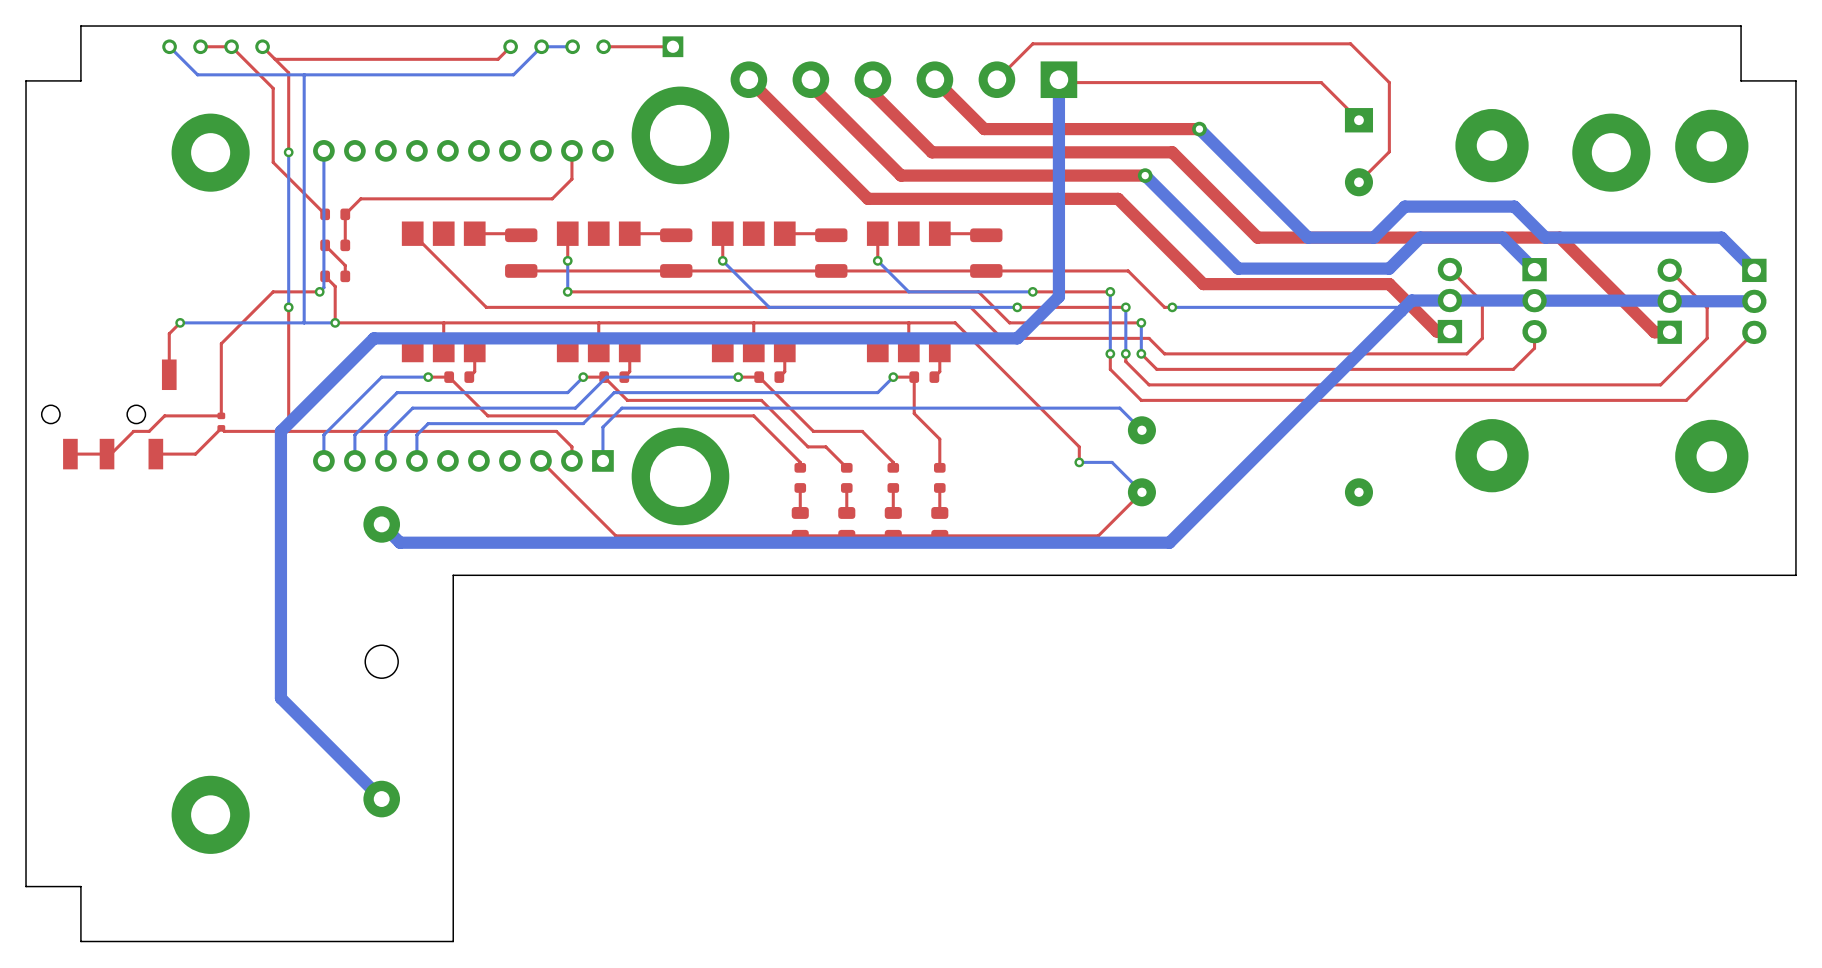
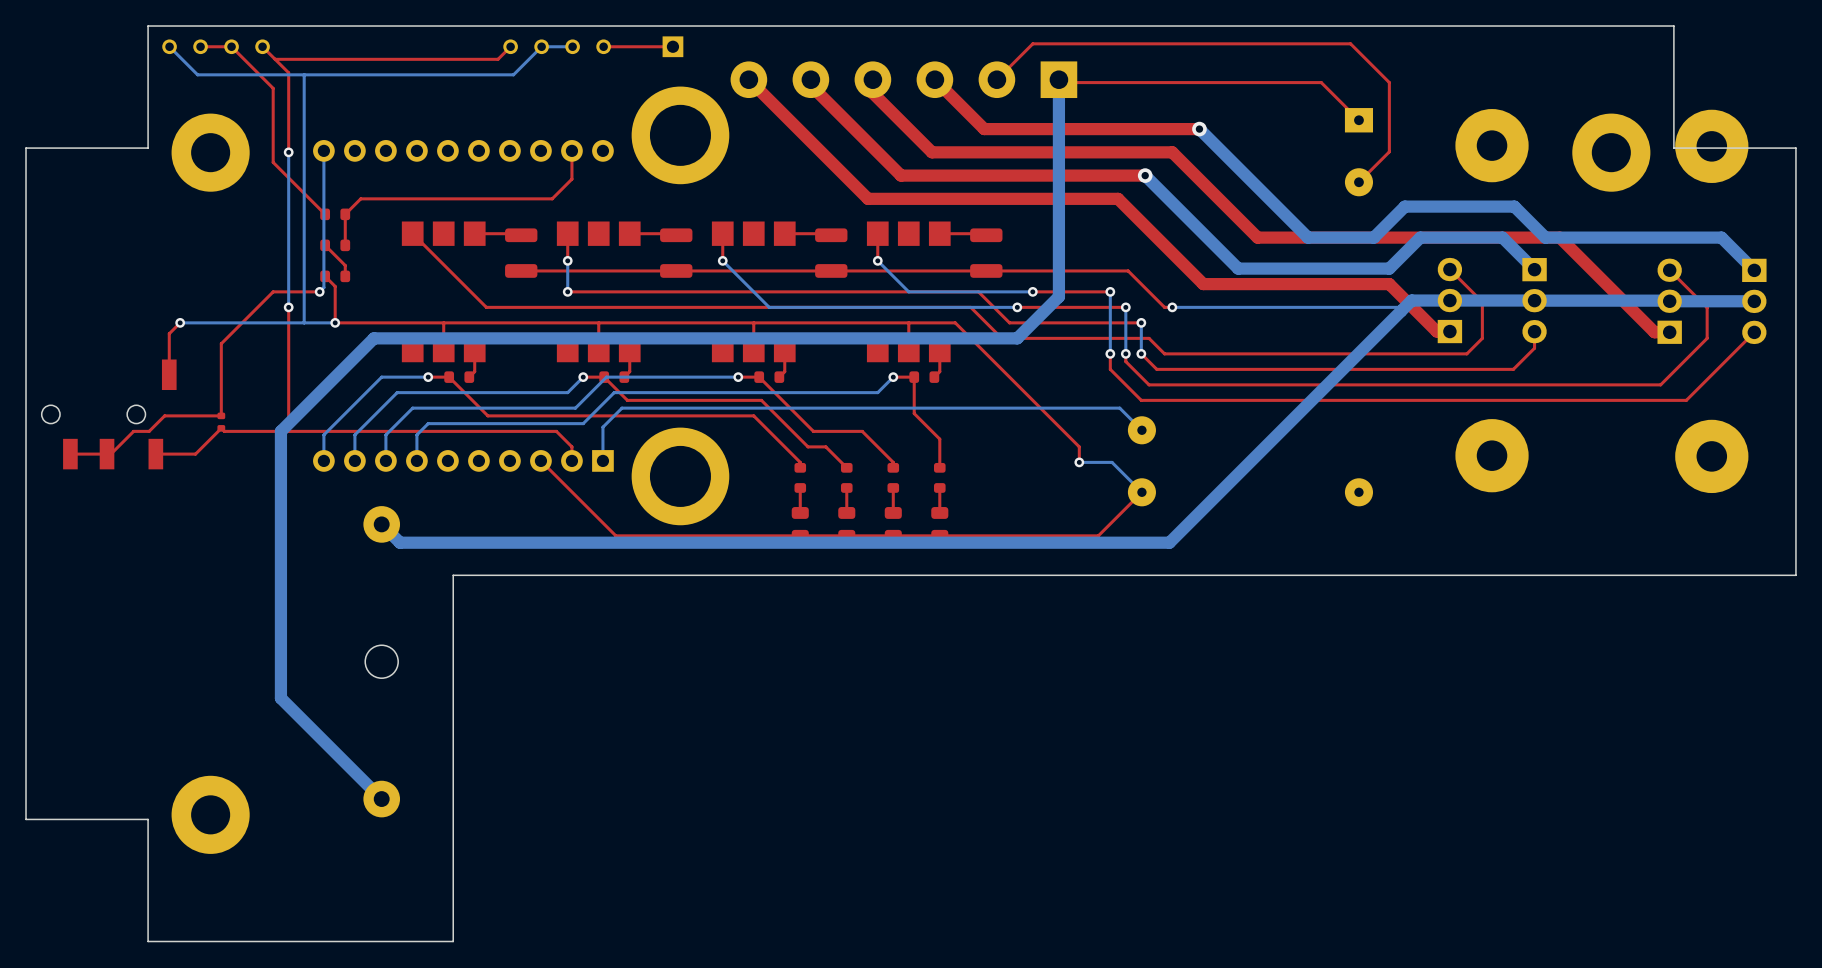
board edge: (148, 26) (80, 26) (80, 80) (26, 80) (26, 148) -> (148, 26) (148, 148) (26, 148)
board edge: (1673, 26) (1741, 26) (1741, 80) (1795, 80) (1795, 148) -> (1673, 26) (1673, 148) (1795, 148)
board edge: (26, 819) (26, 886) (80, 886) (80, 941) (148, 941) -> (26, 819) (148, 819) (148, 941)

